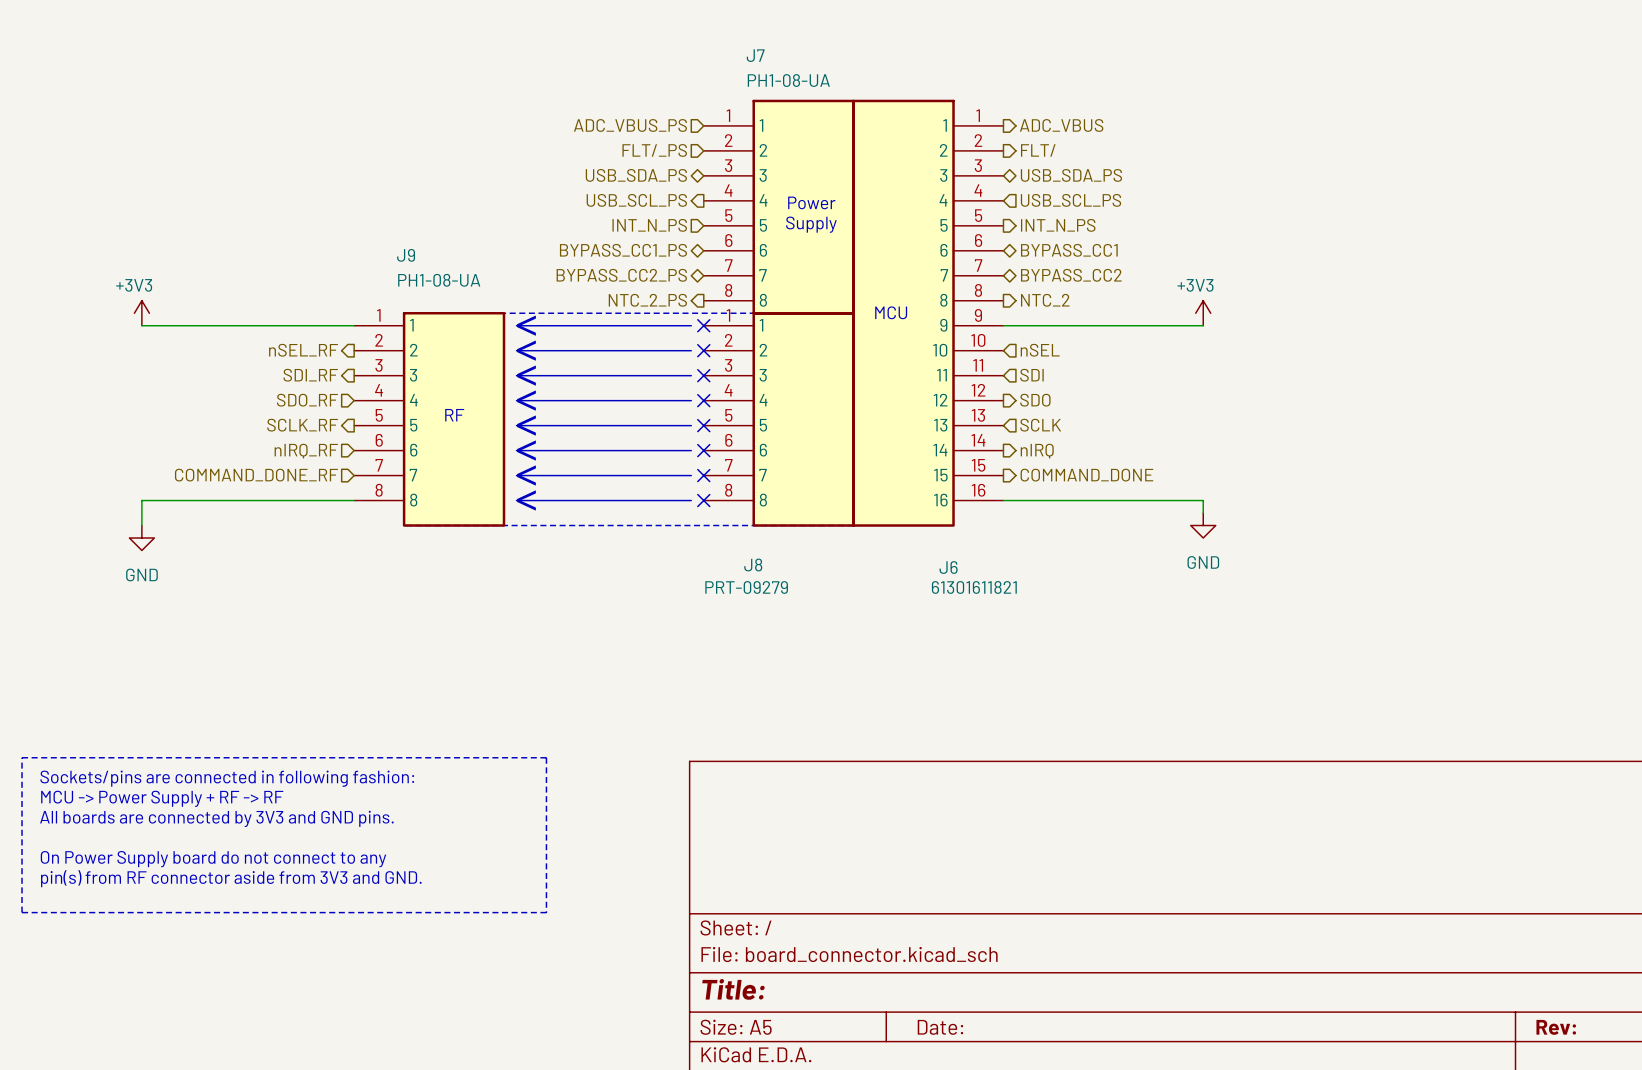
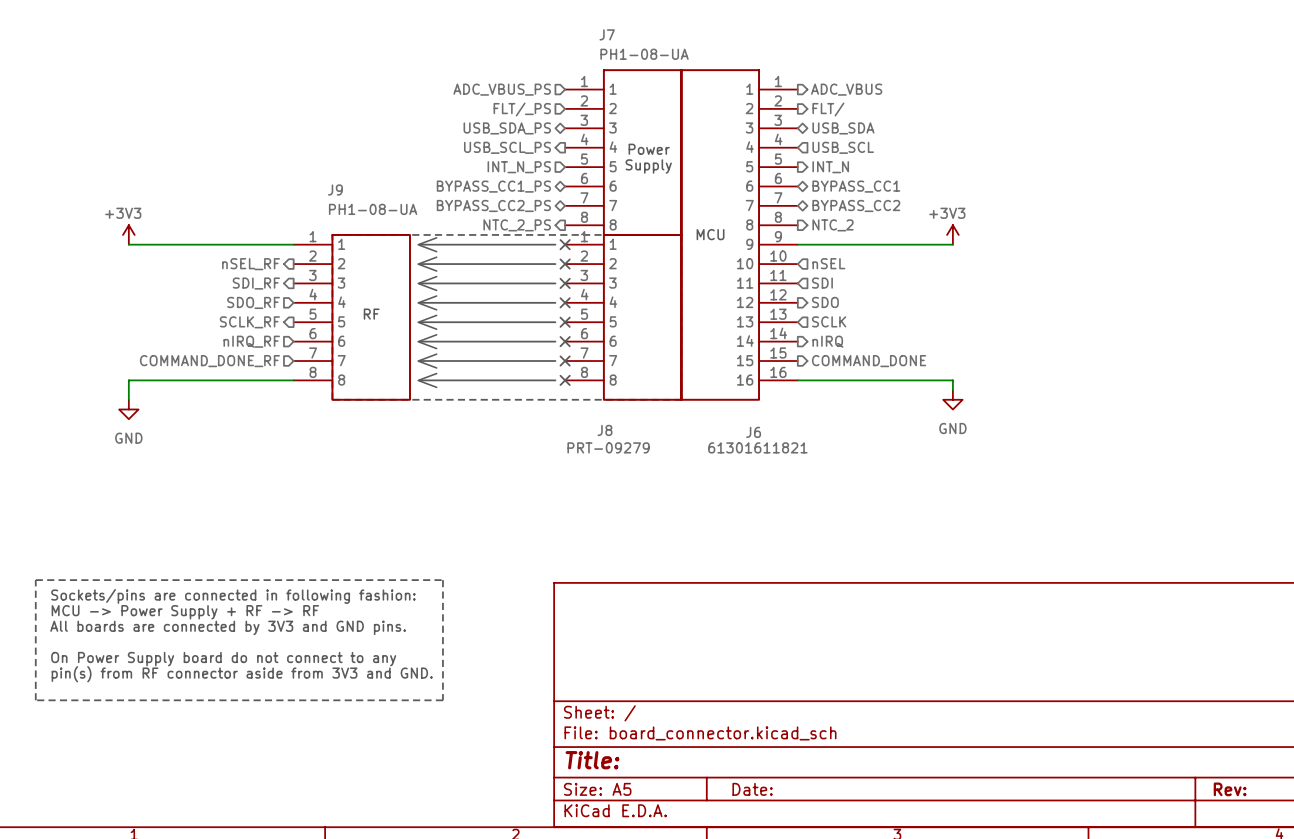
hierarchical label: USB_SDA_PS (1071, 175) -> USB_SDA (843, 128)
hierarchical label: USB_SCL_PS (1070, 200) -> USB_SCL (843, 147)
hierarchical label: INT_N_PS (1058, 225) -> INT_N (830, 167)

